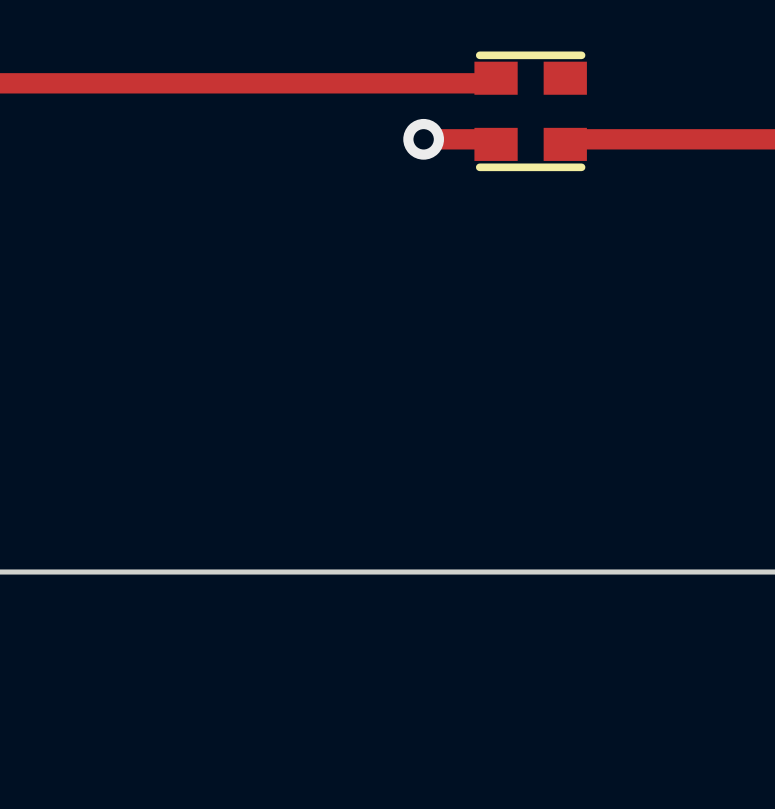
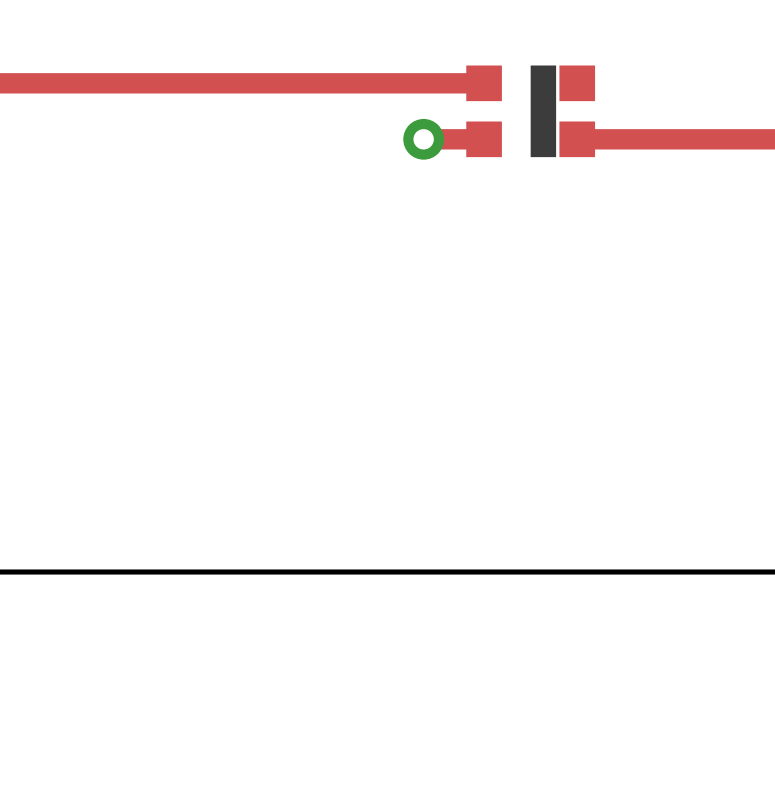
part footprint: [474, 51, 587, 172] -> [466, 65, 596, 158]

